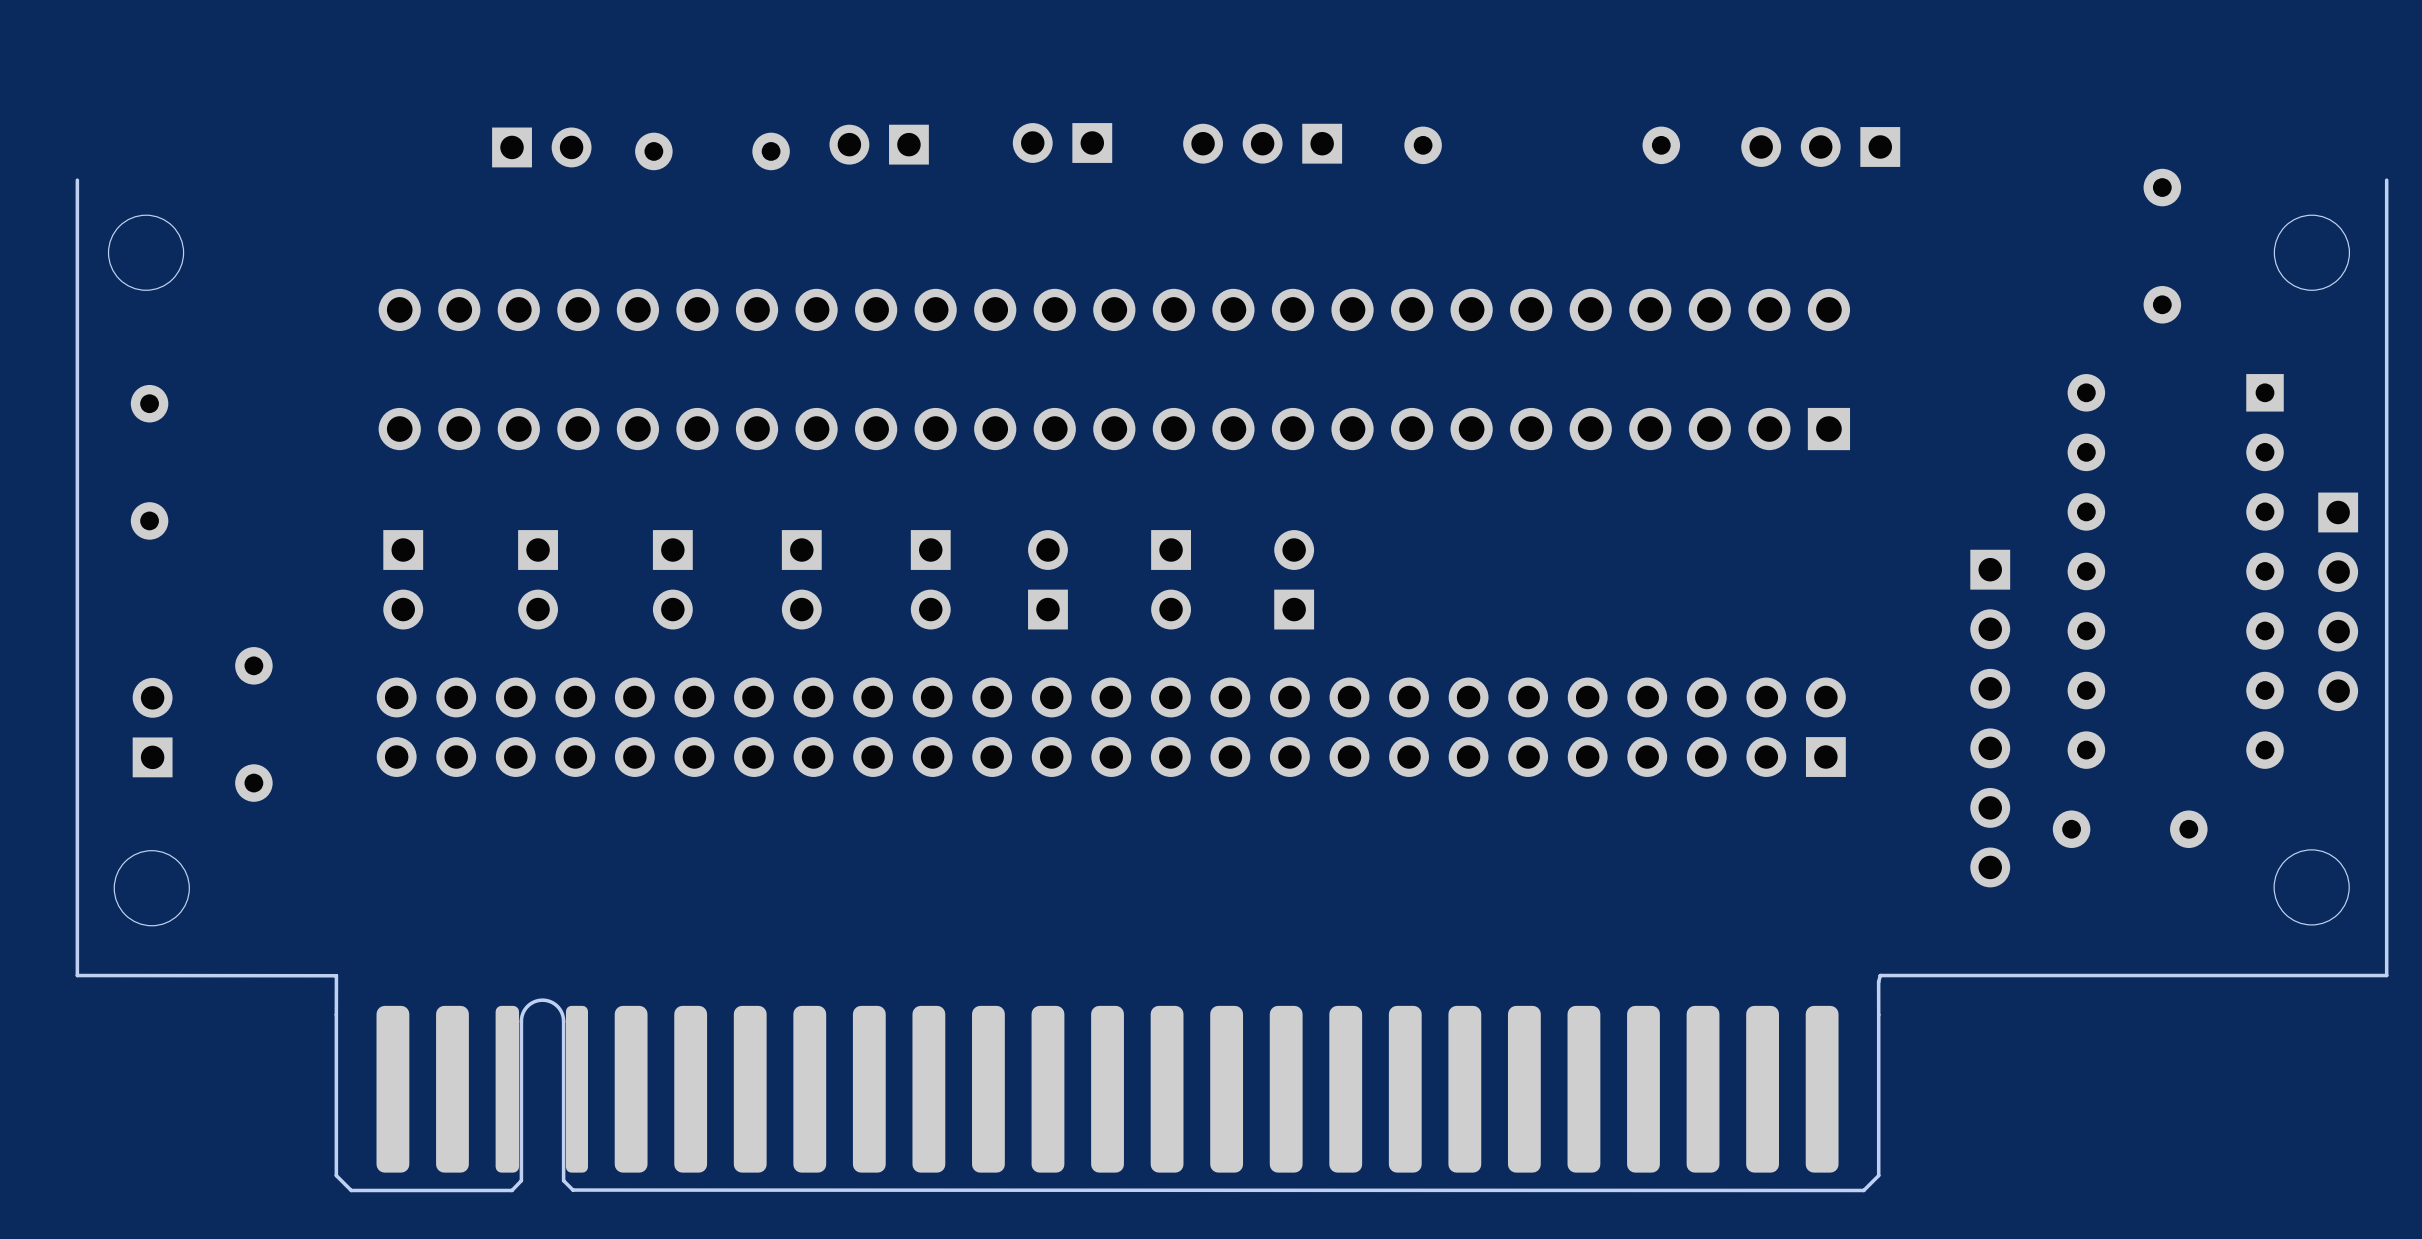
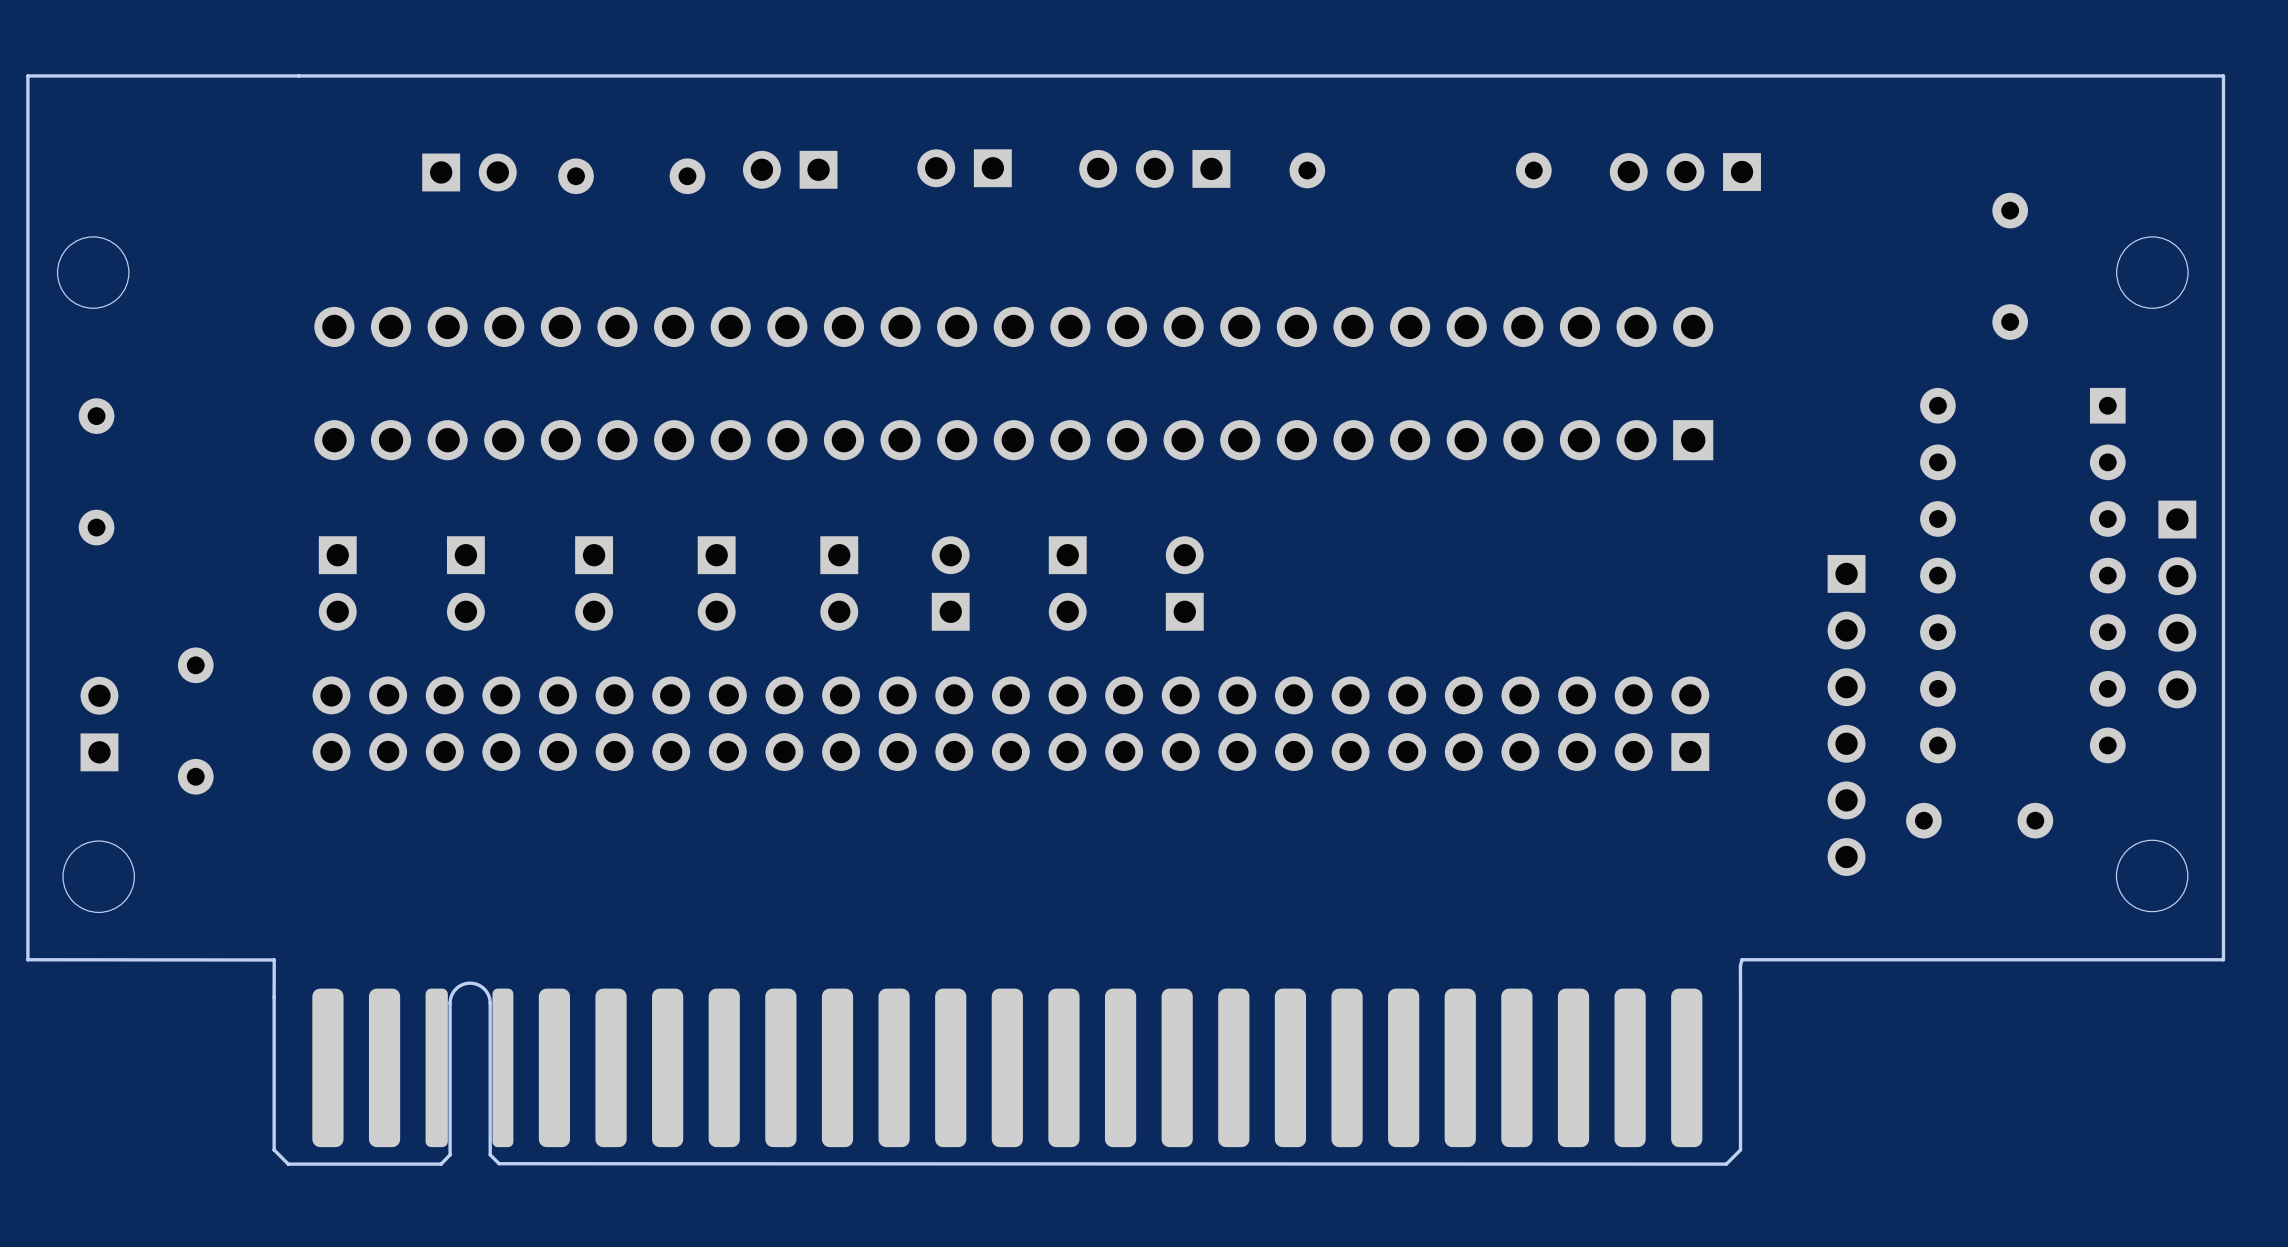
board edge: none -> (2223, 203) (2223, 75) (27, 75) (27, 203)

